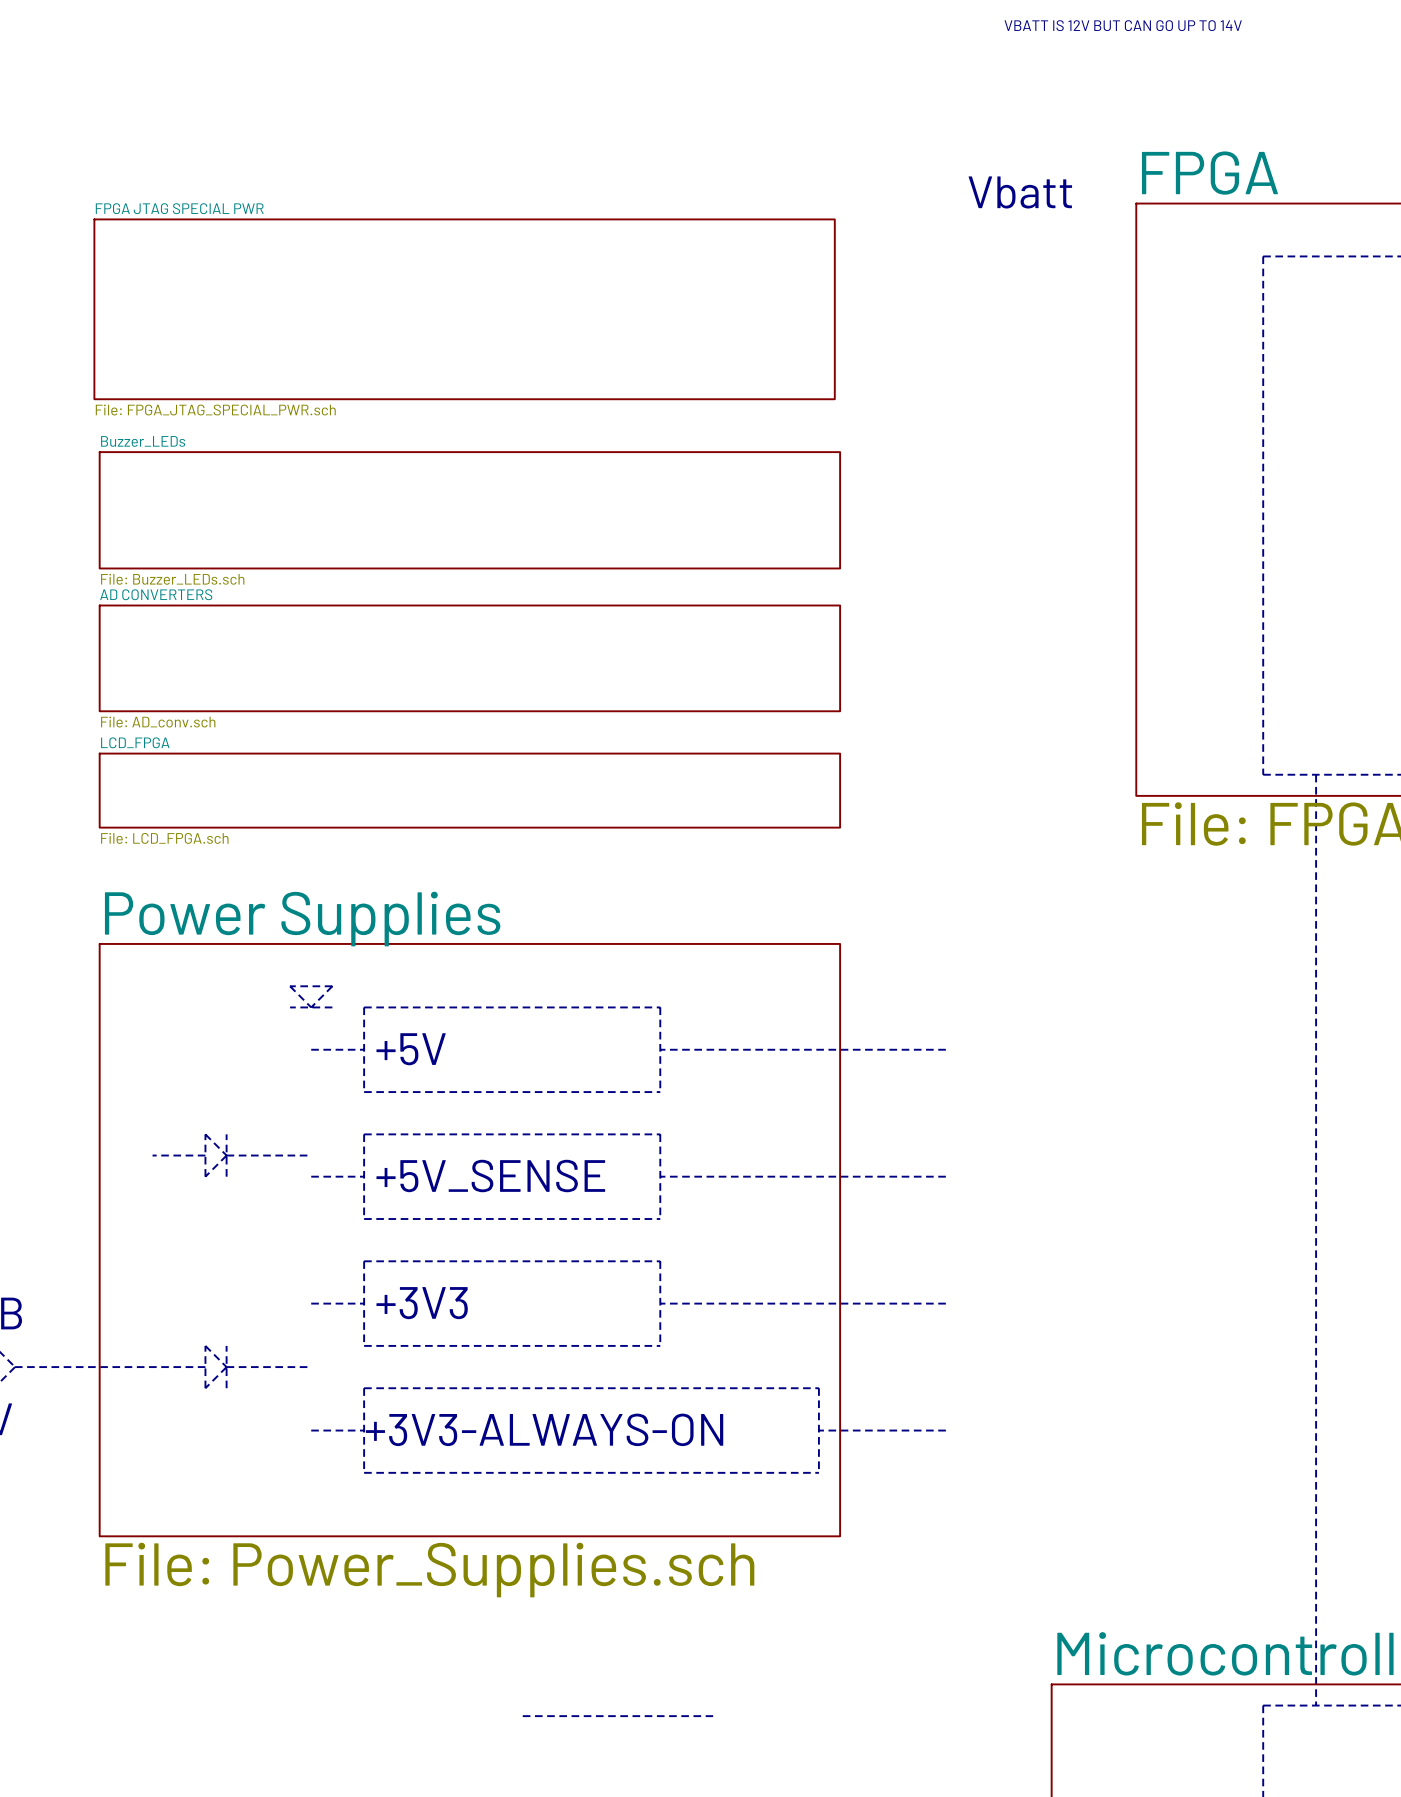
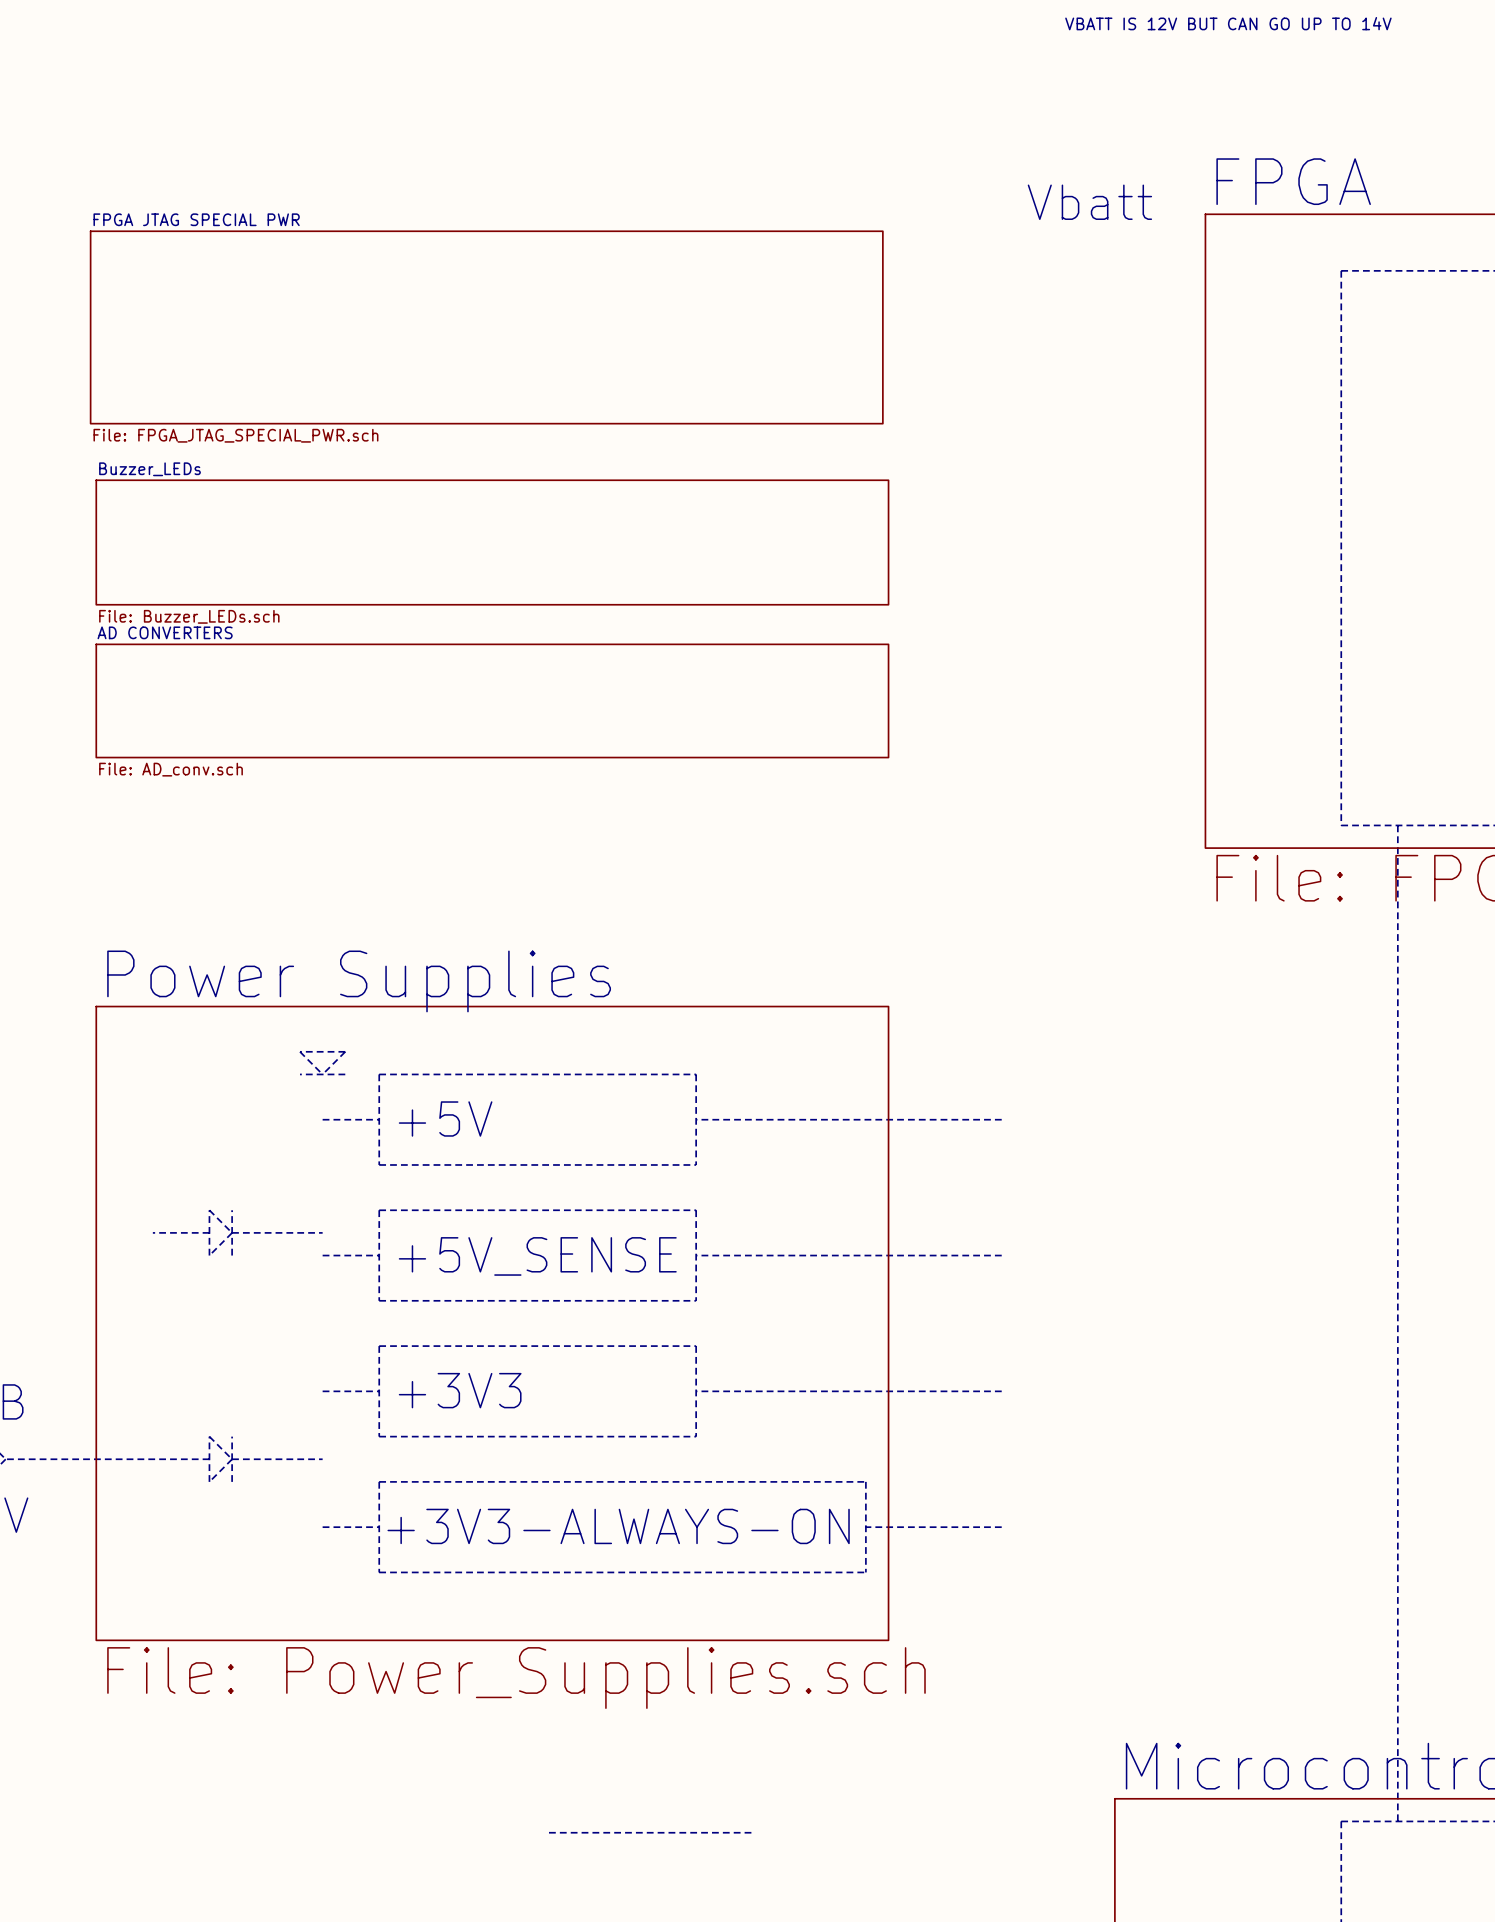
sheet LCD_FPGA: File: LCD_FPGA.sch (469, 790) -> none

